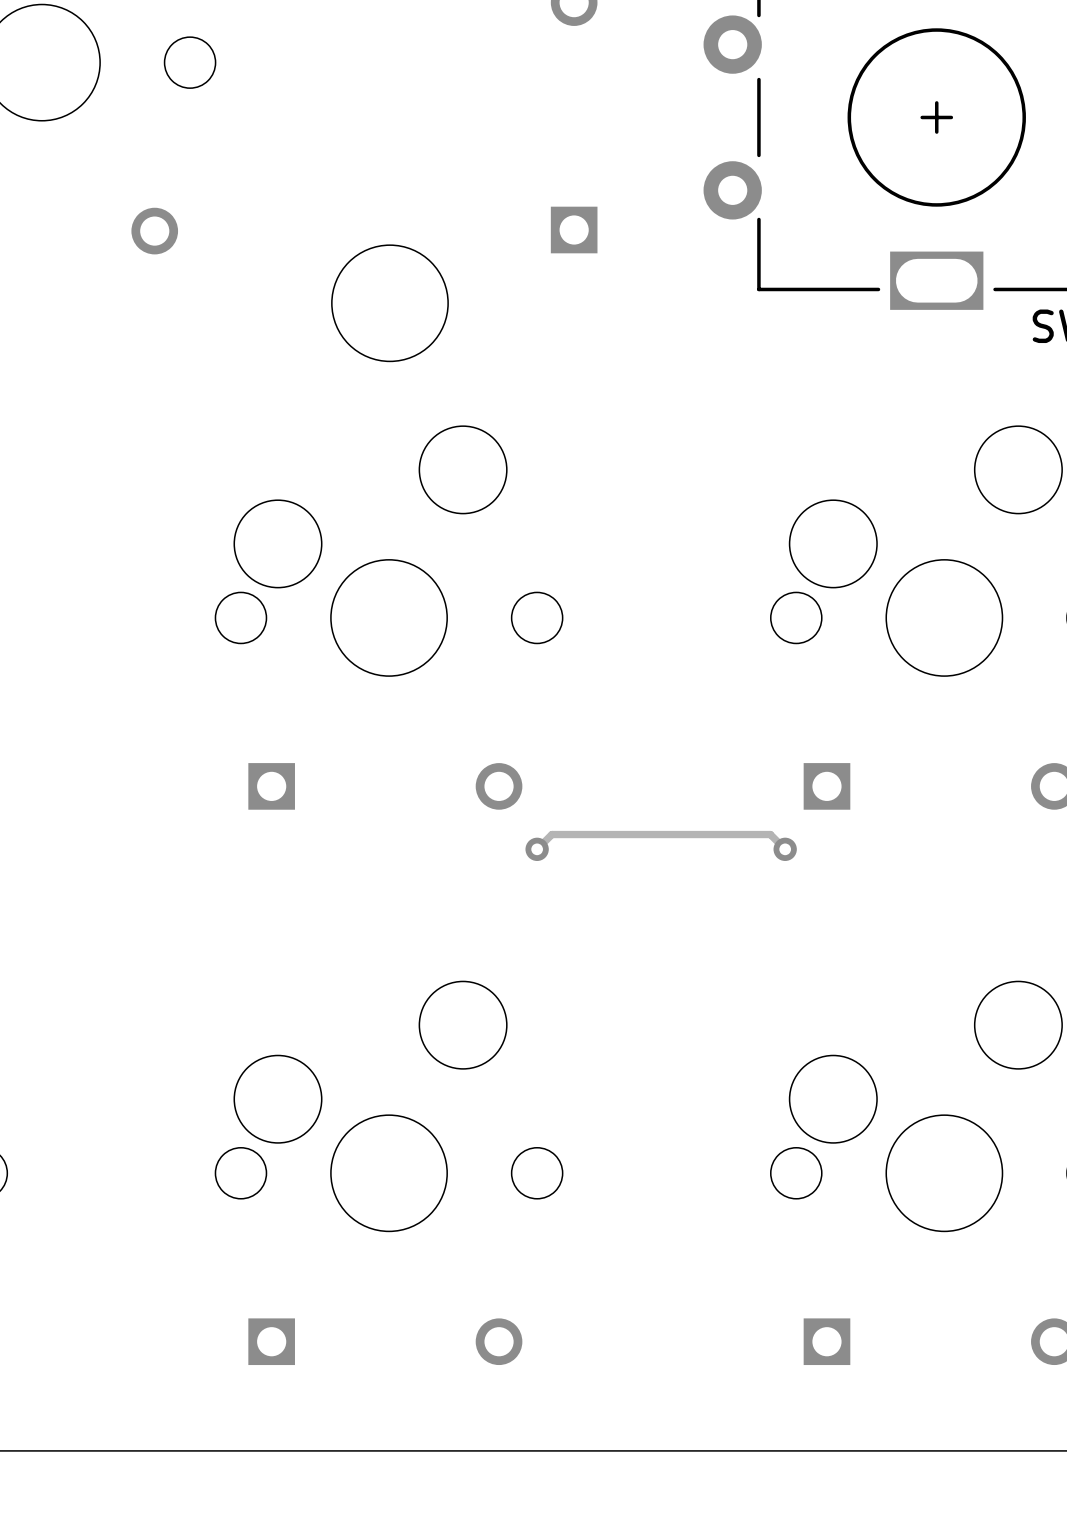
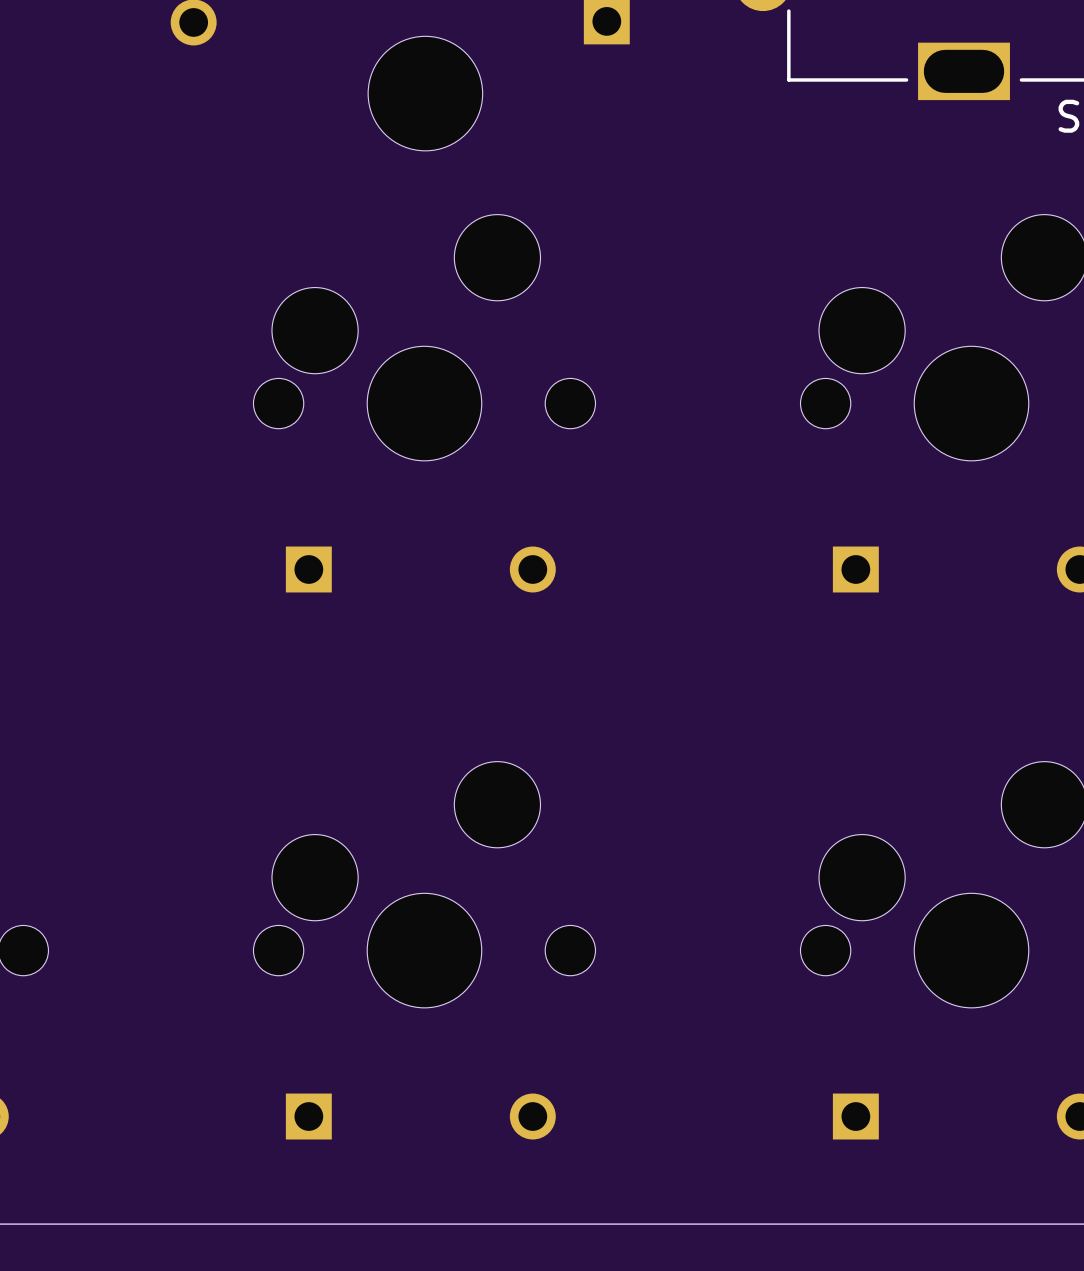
track: (537, 849) (551, 834) (770, 834) (785, 849) -> none
via: (537, 849) -> none
via: (785, 849) -> none

